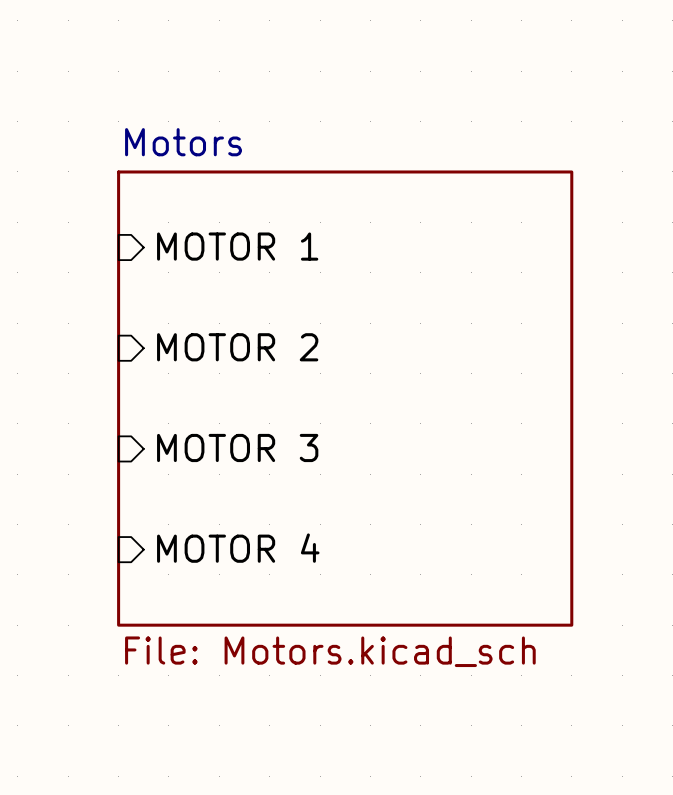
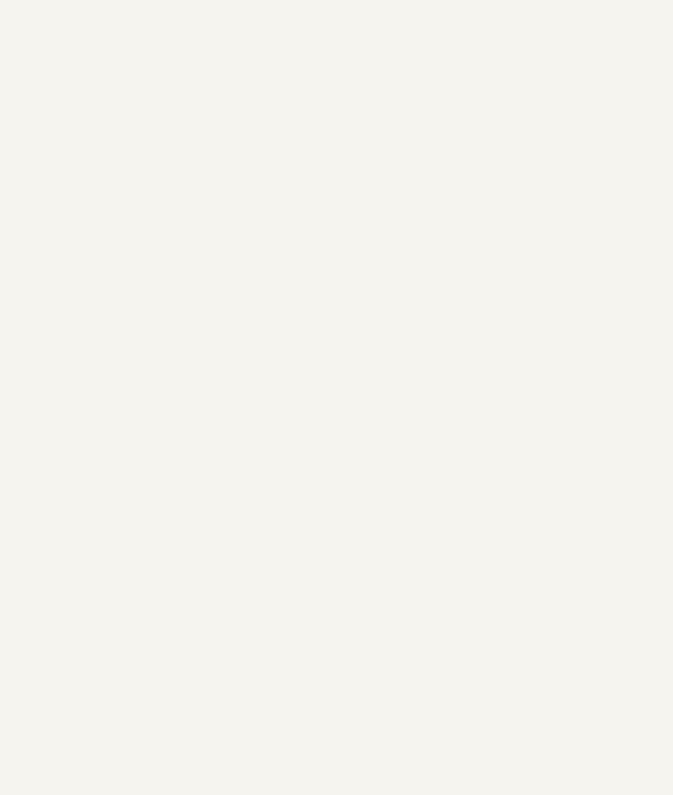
sheet pin: MOTOR 1 (237, 246) -> none
sheet pin: MOTOR 2 (237, 347) -> none
sheet Motors: File: Motors.kicad_sch (345, 398) -> none
sheet pin: MOTOR 3 (237, 447) -> none
sheet pin: MOTOR 4 (238, 548) -> none

